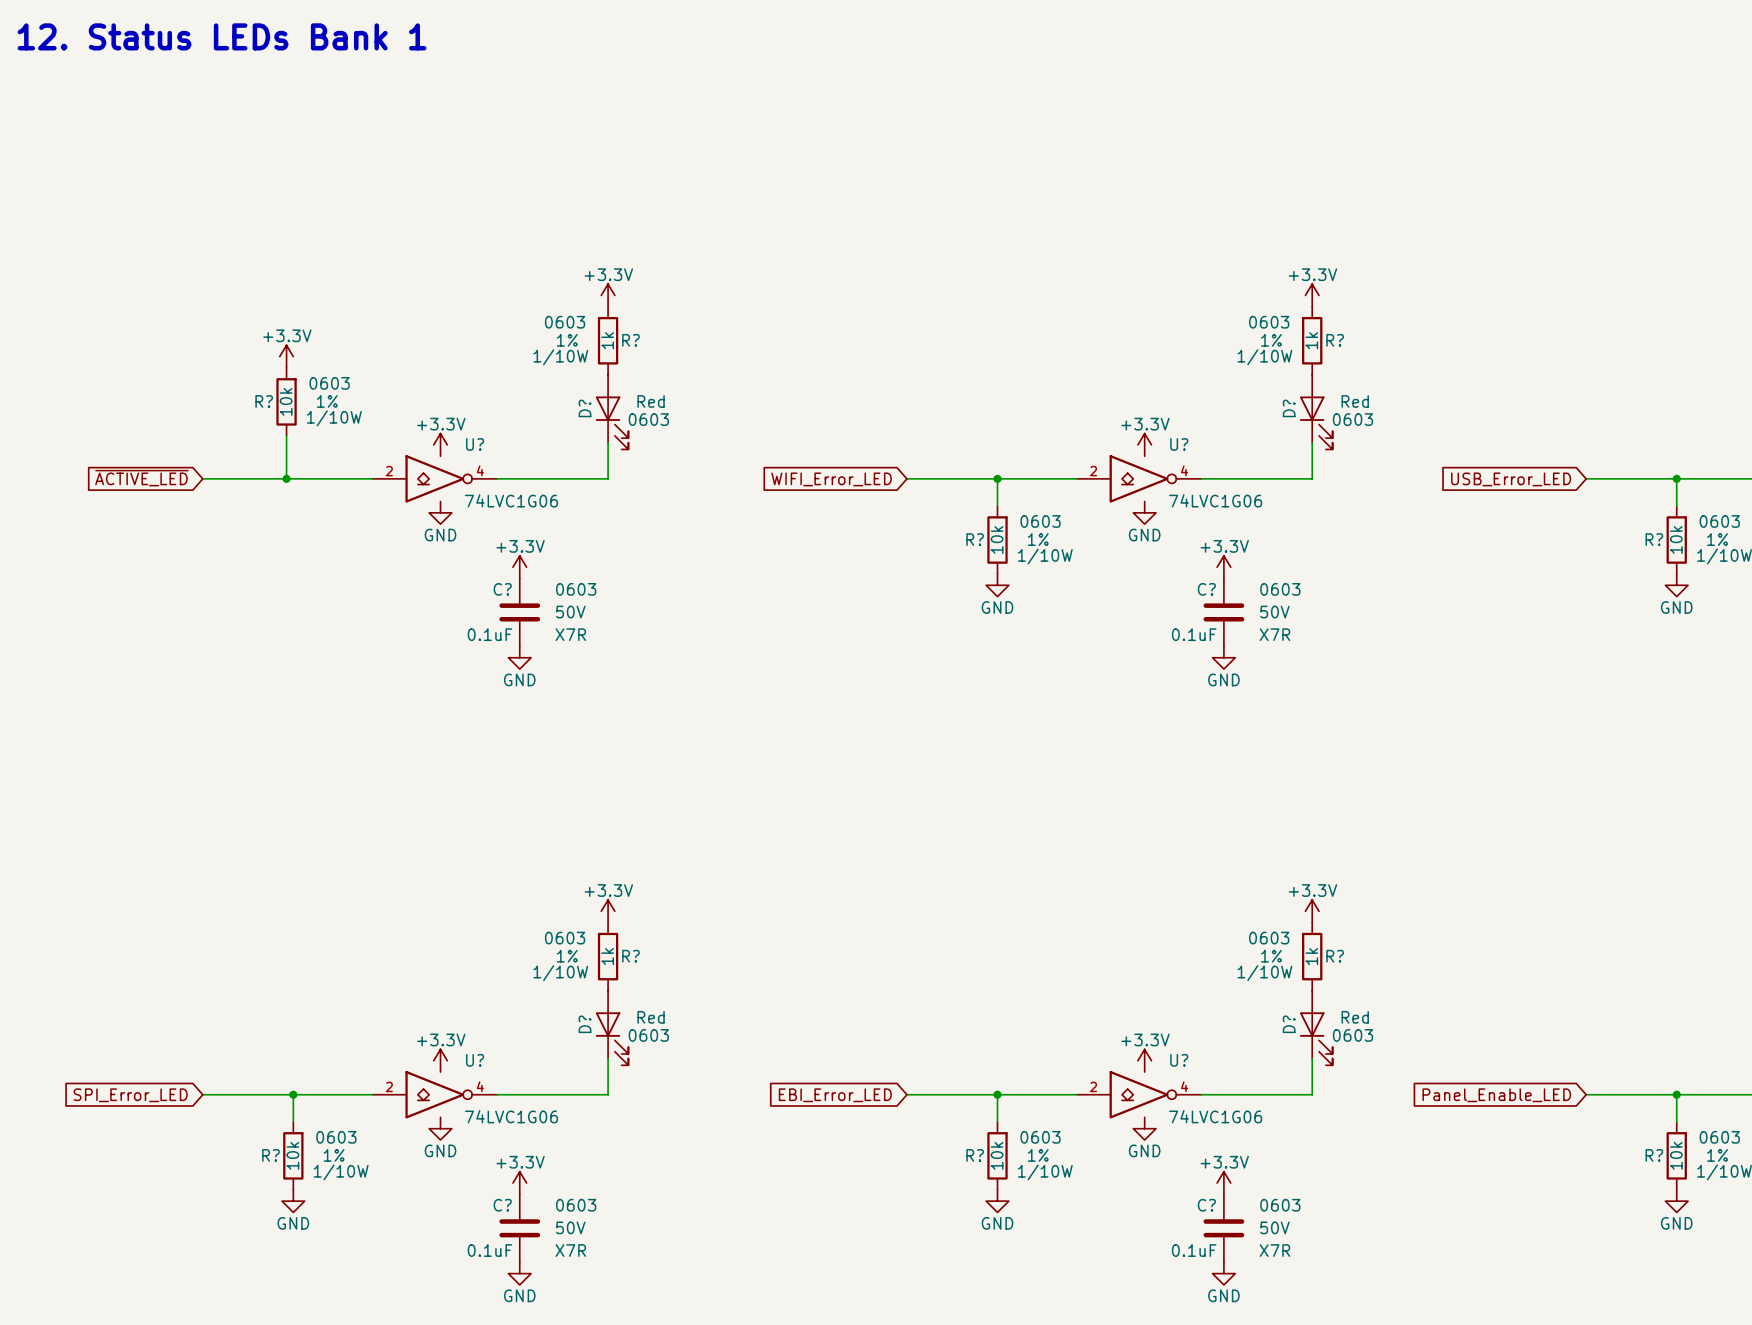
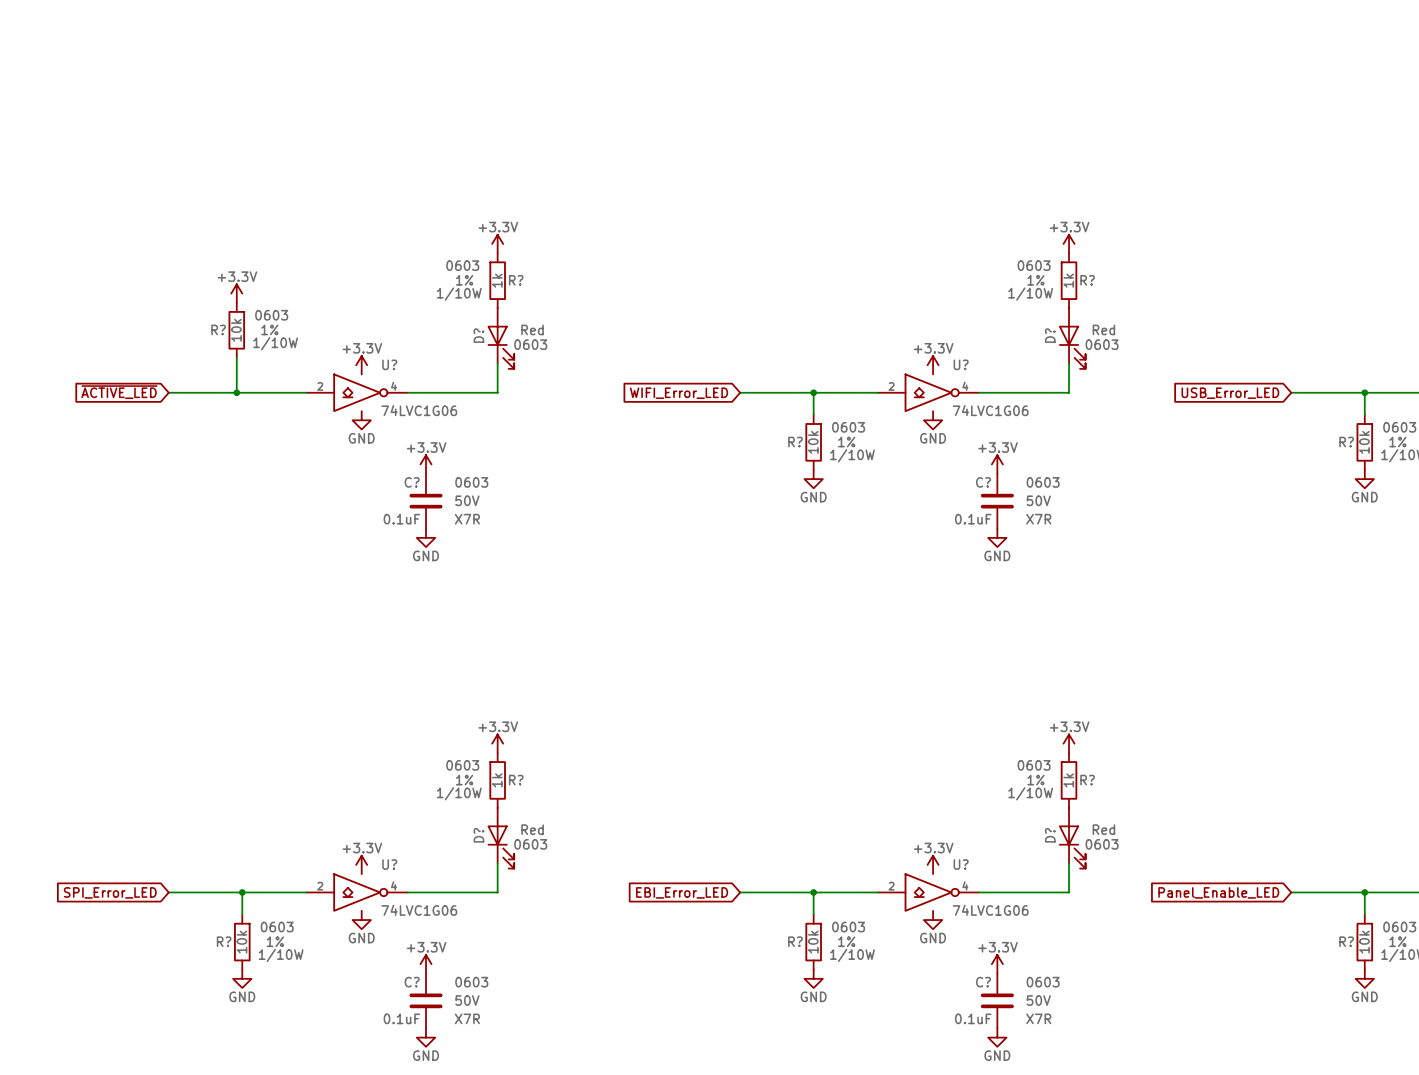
text: 12. Status LEDs Bank 1 (222, 36) -> none

